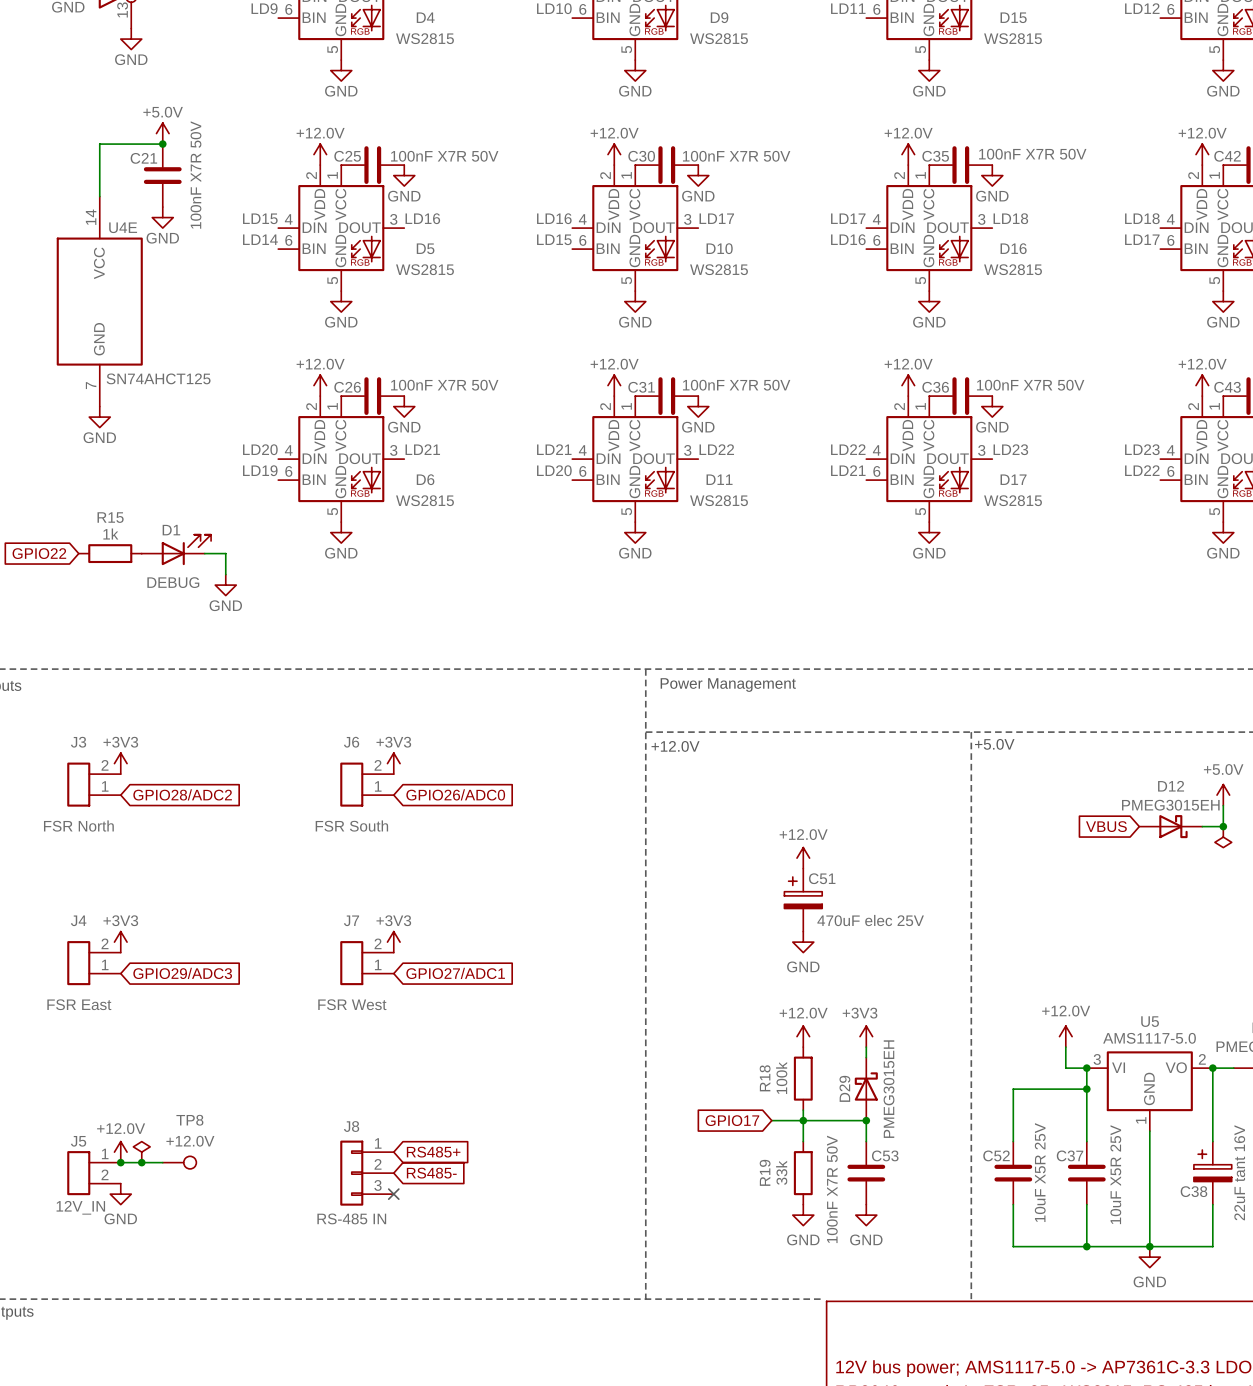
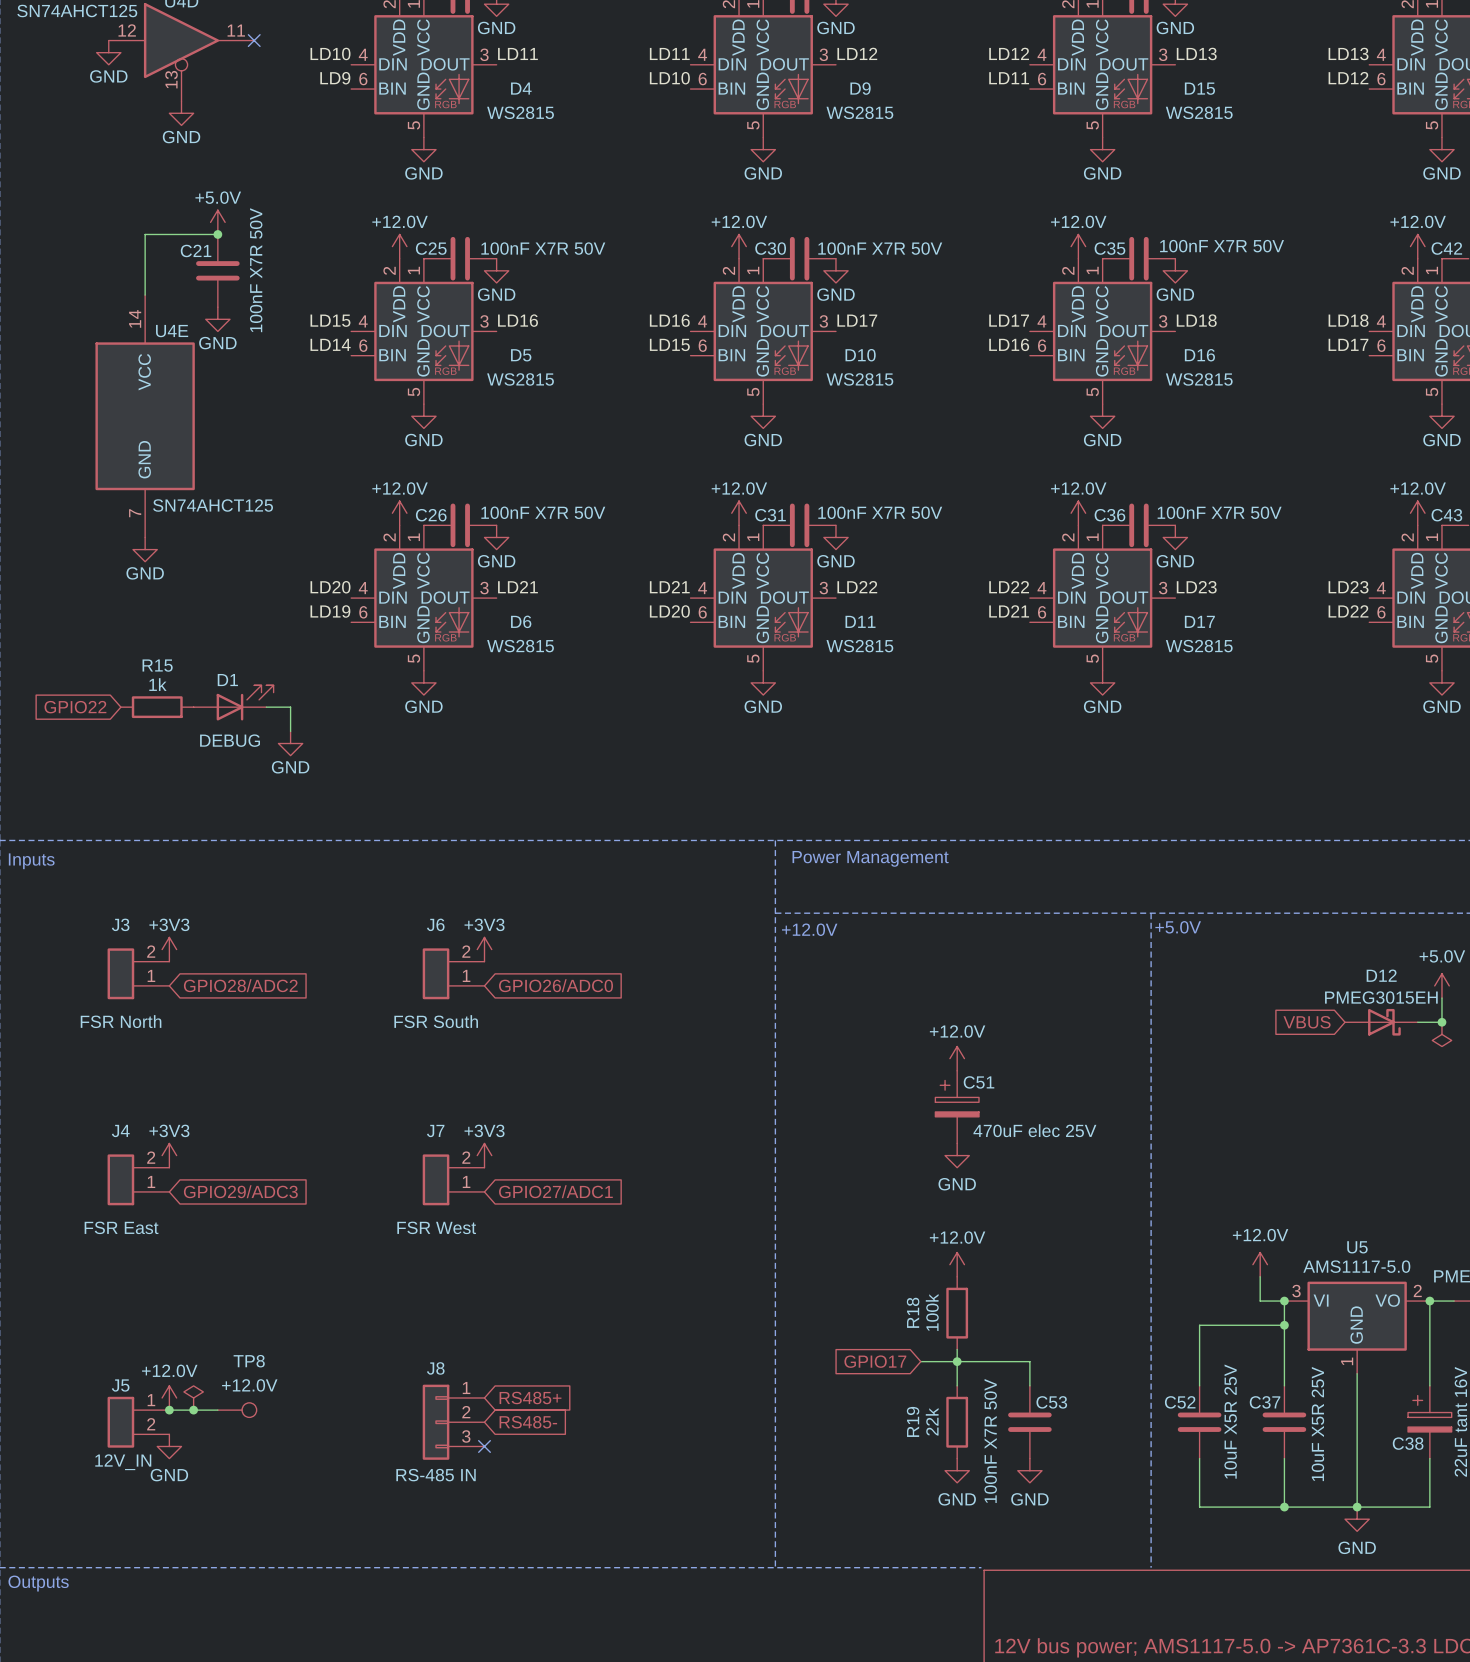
power symbol: +3V3 (866, 1036) -> none
wire: (866, 1047) (866, 1057) -> none
D29: PMEG3015EH (866, 1089) -> none
junction: (866, 1120) -> none
R19 value: 33k (781, 1172) -> 22k (932, 1421)

